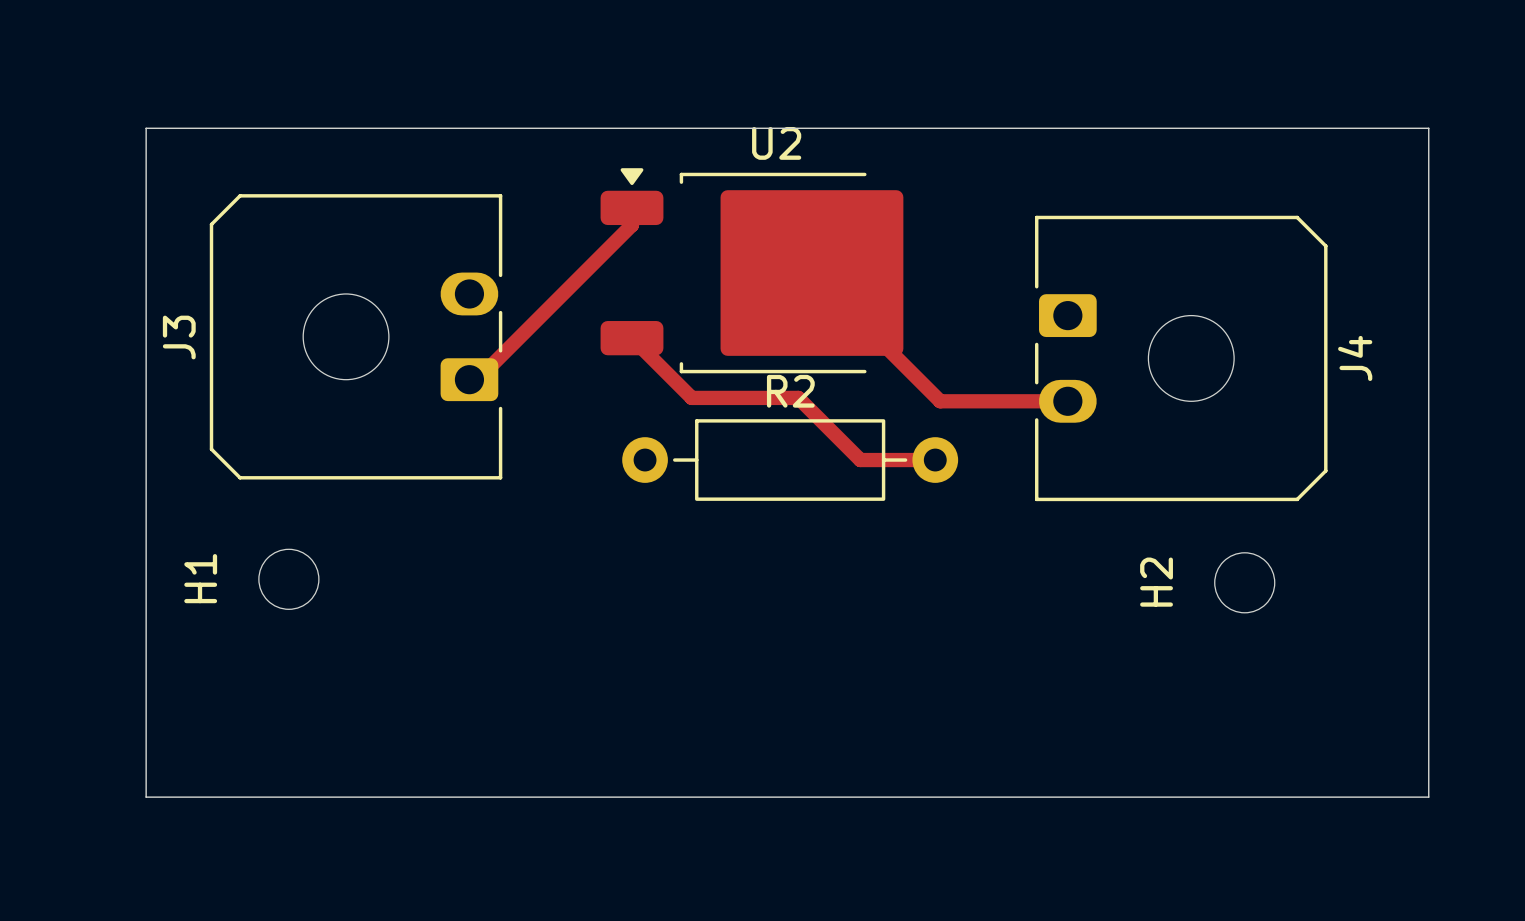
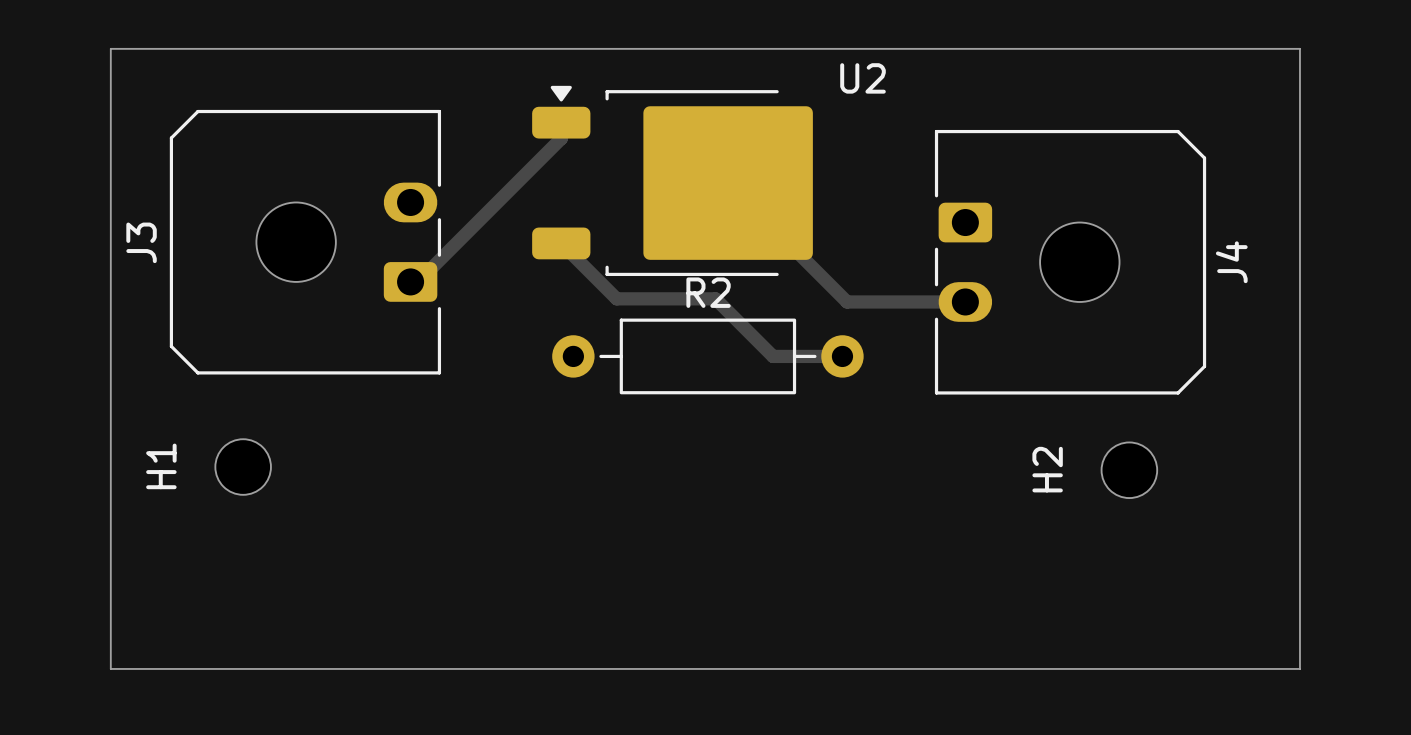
U2 name position: U2 (776, 143) -> U2 (863, 78)

